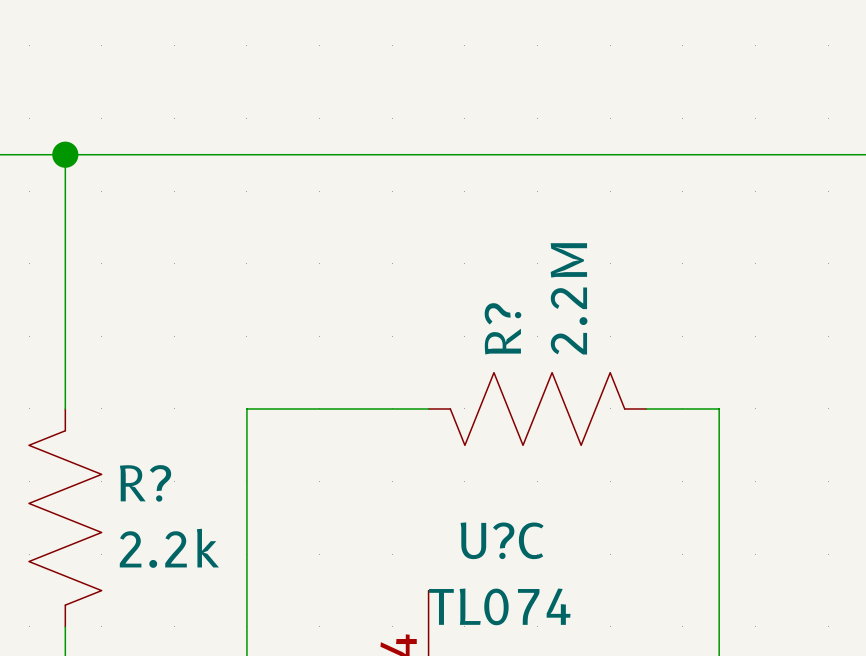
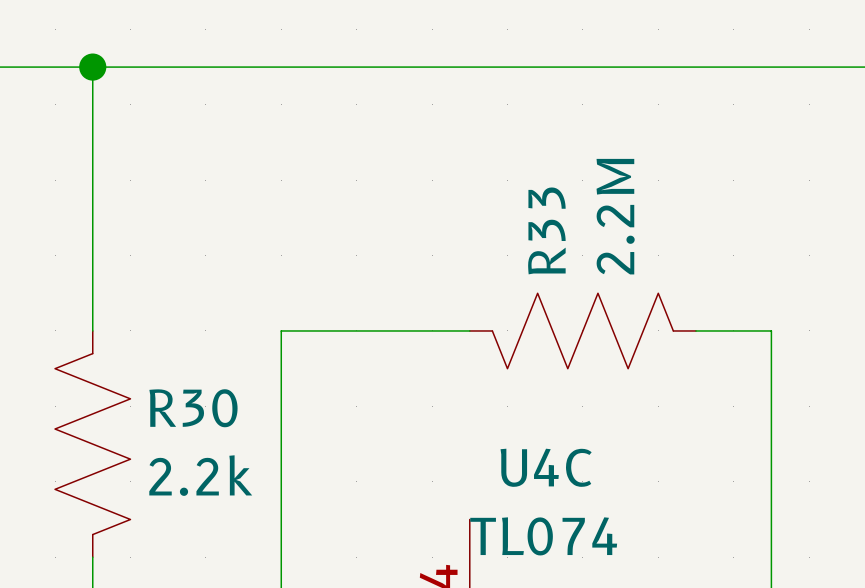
R? name: R? (502, 328) -> R33 (546, 230)
R? name: R? (145, 483) -> R30 (193, 408)
U?C name: U?C (502, 540) -> U4C (546, 467)

